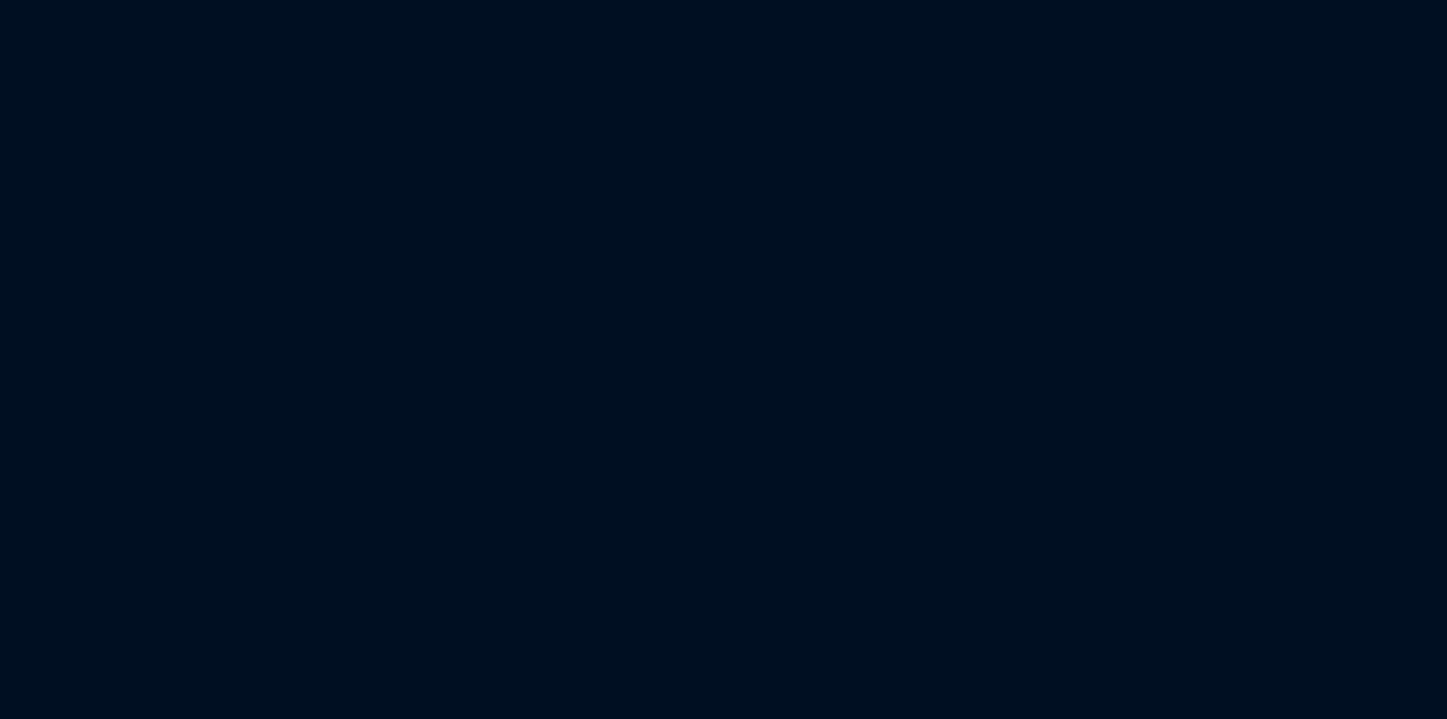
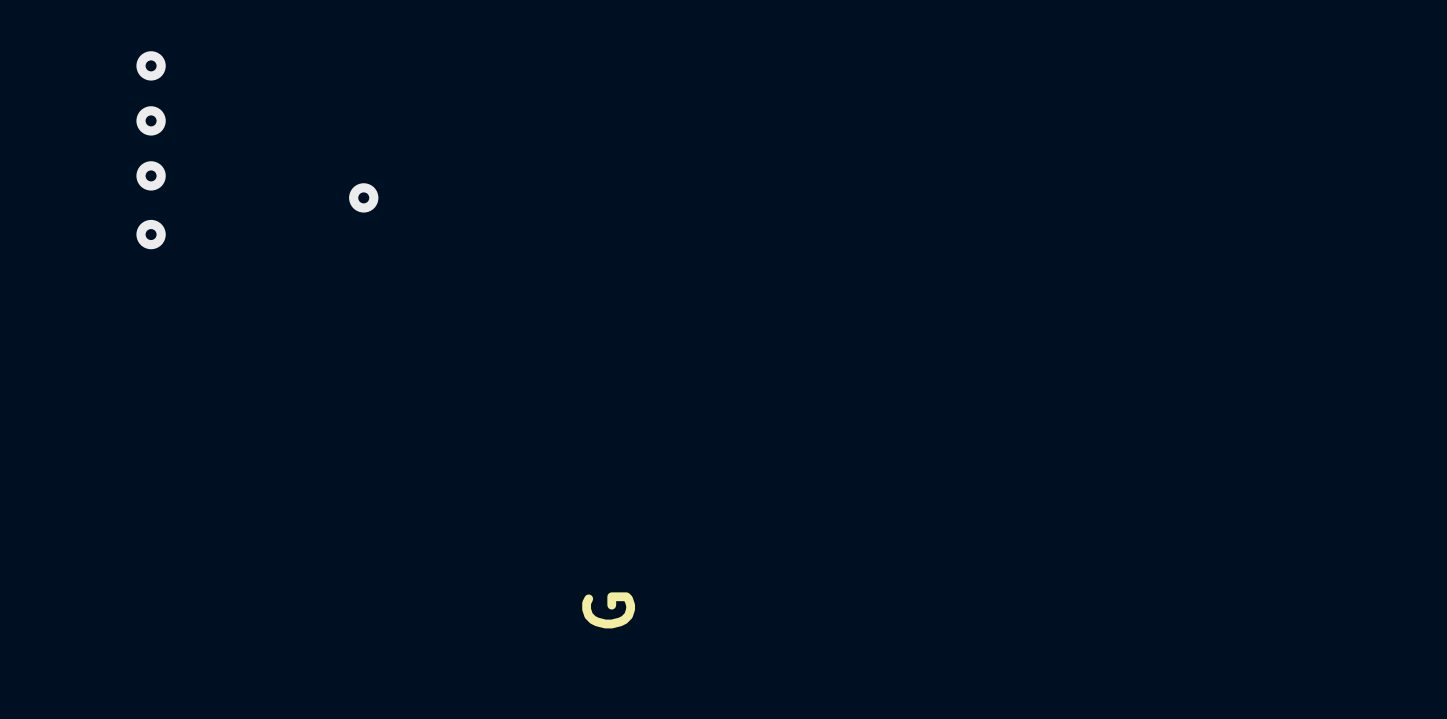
via: none -> (151, 65)
via: none -> (151, 120)
via: none -> (151, 175)
via: none -> (363, 197)
via: none -> (151, 234)
text: none -> G (608, 610)

